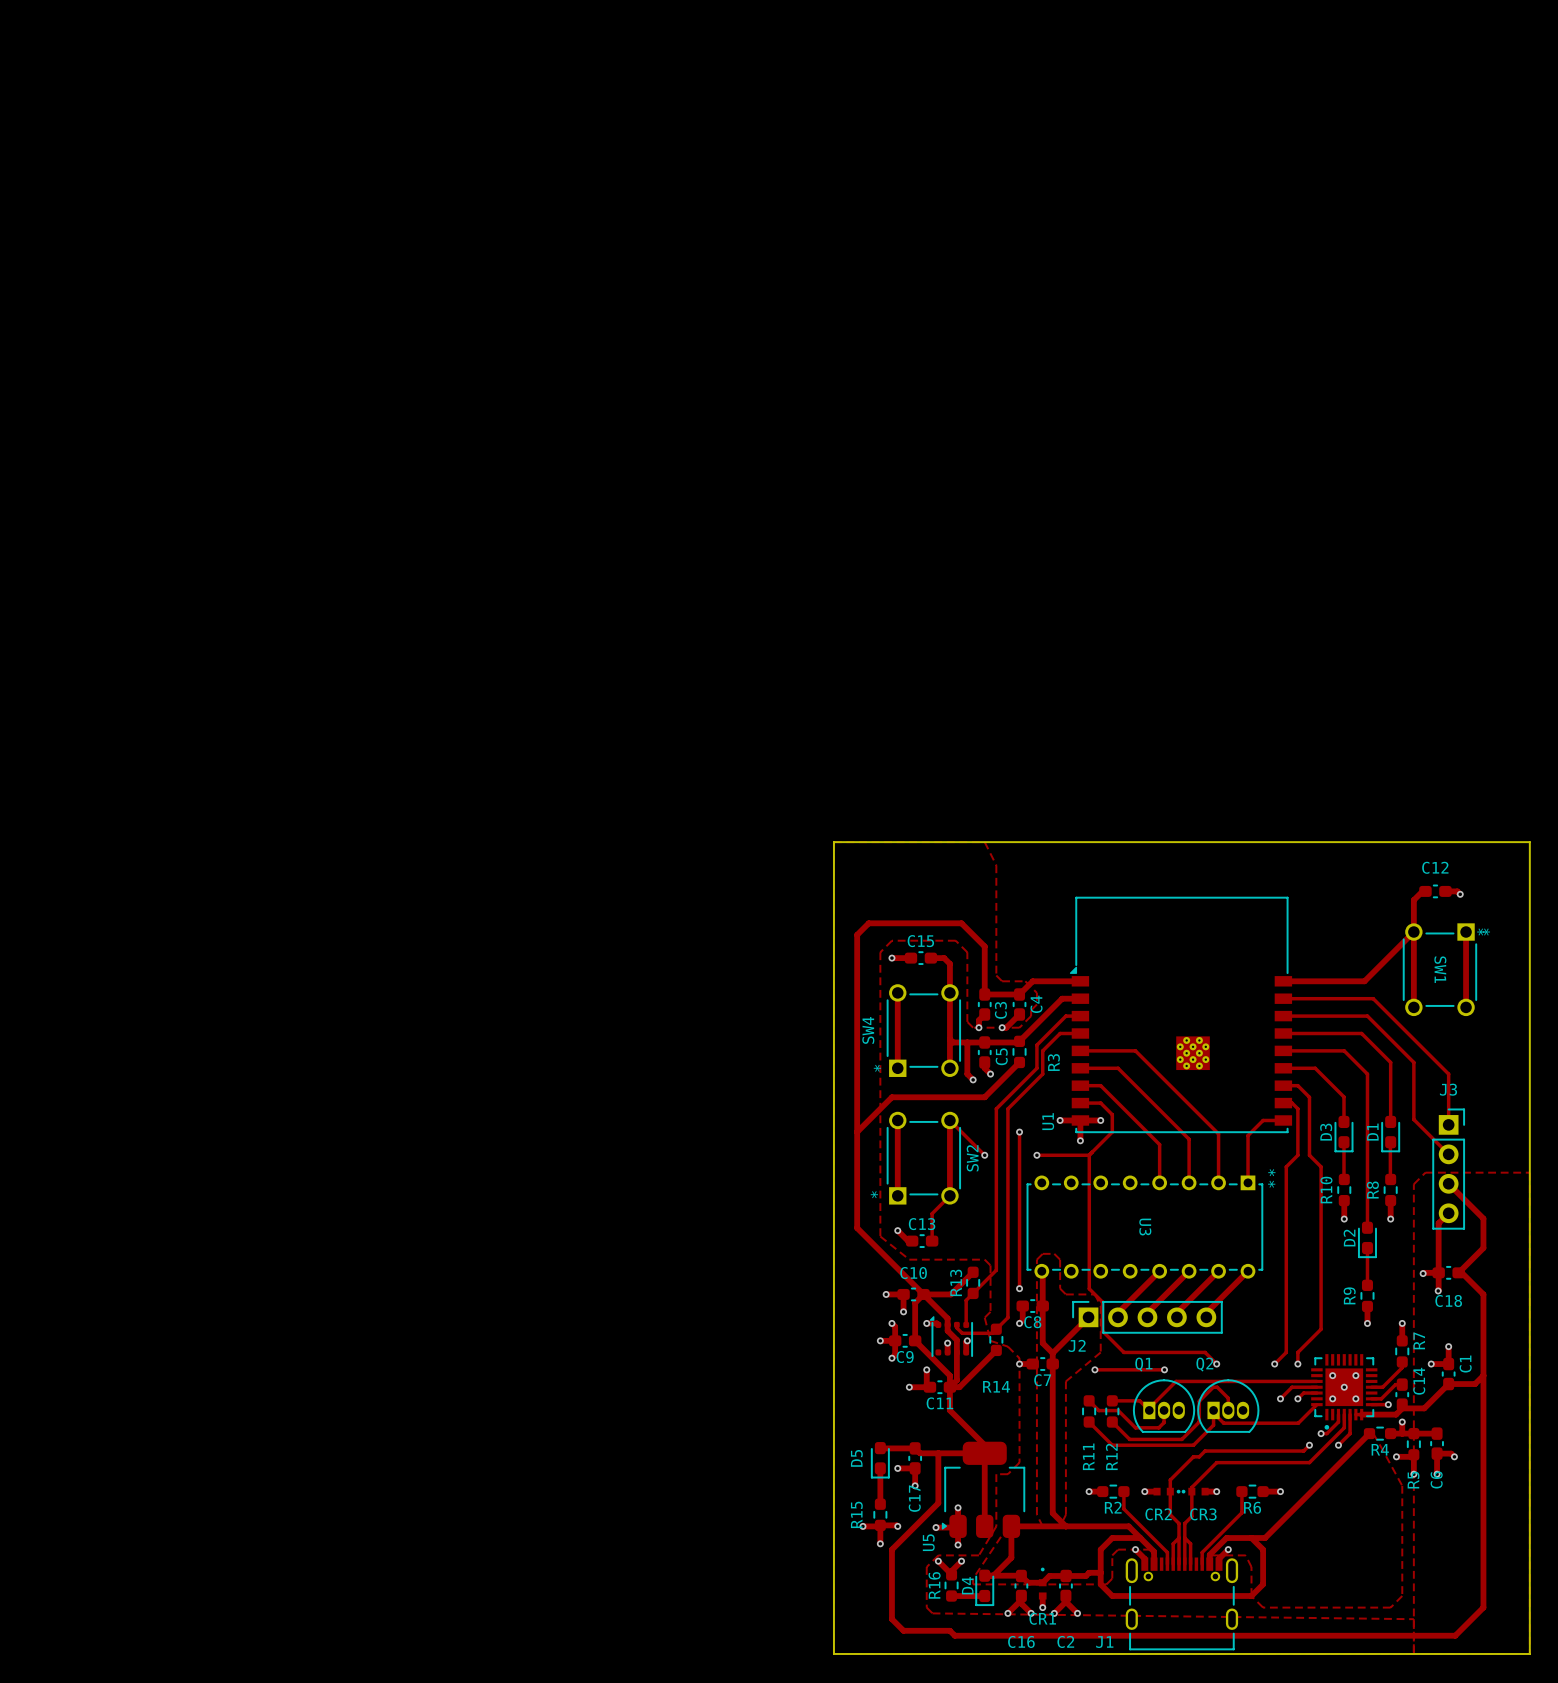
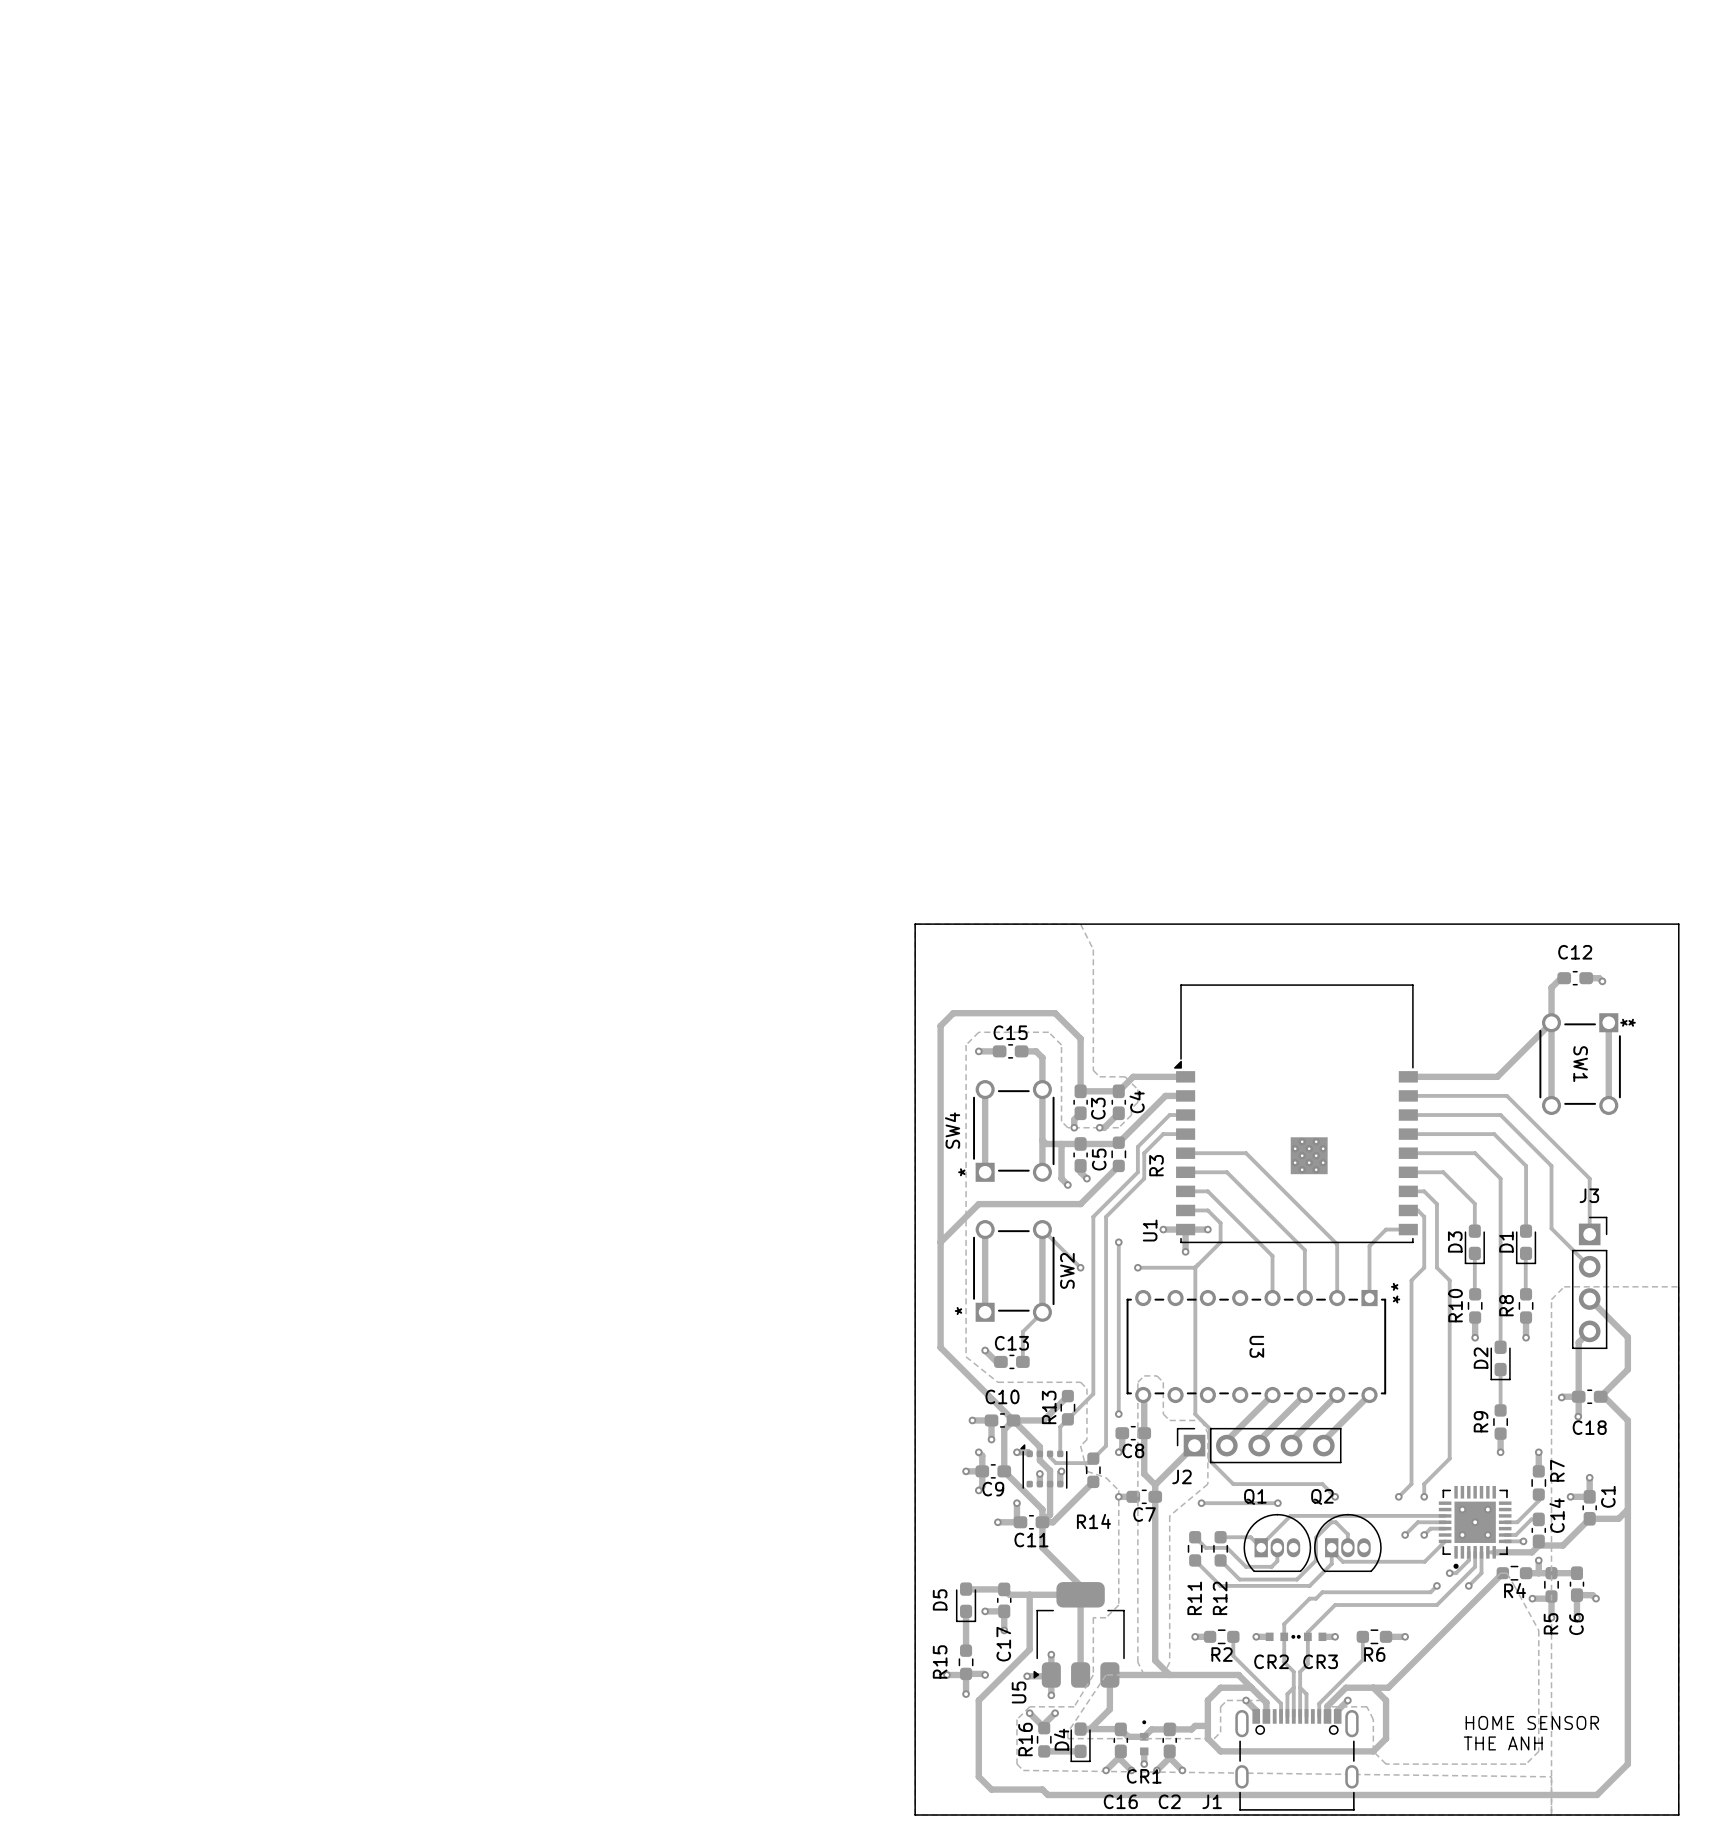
text: none -> HOME SENSOR (1532, 1722)
text: none -> THE ANH (1503, 1743)

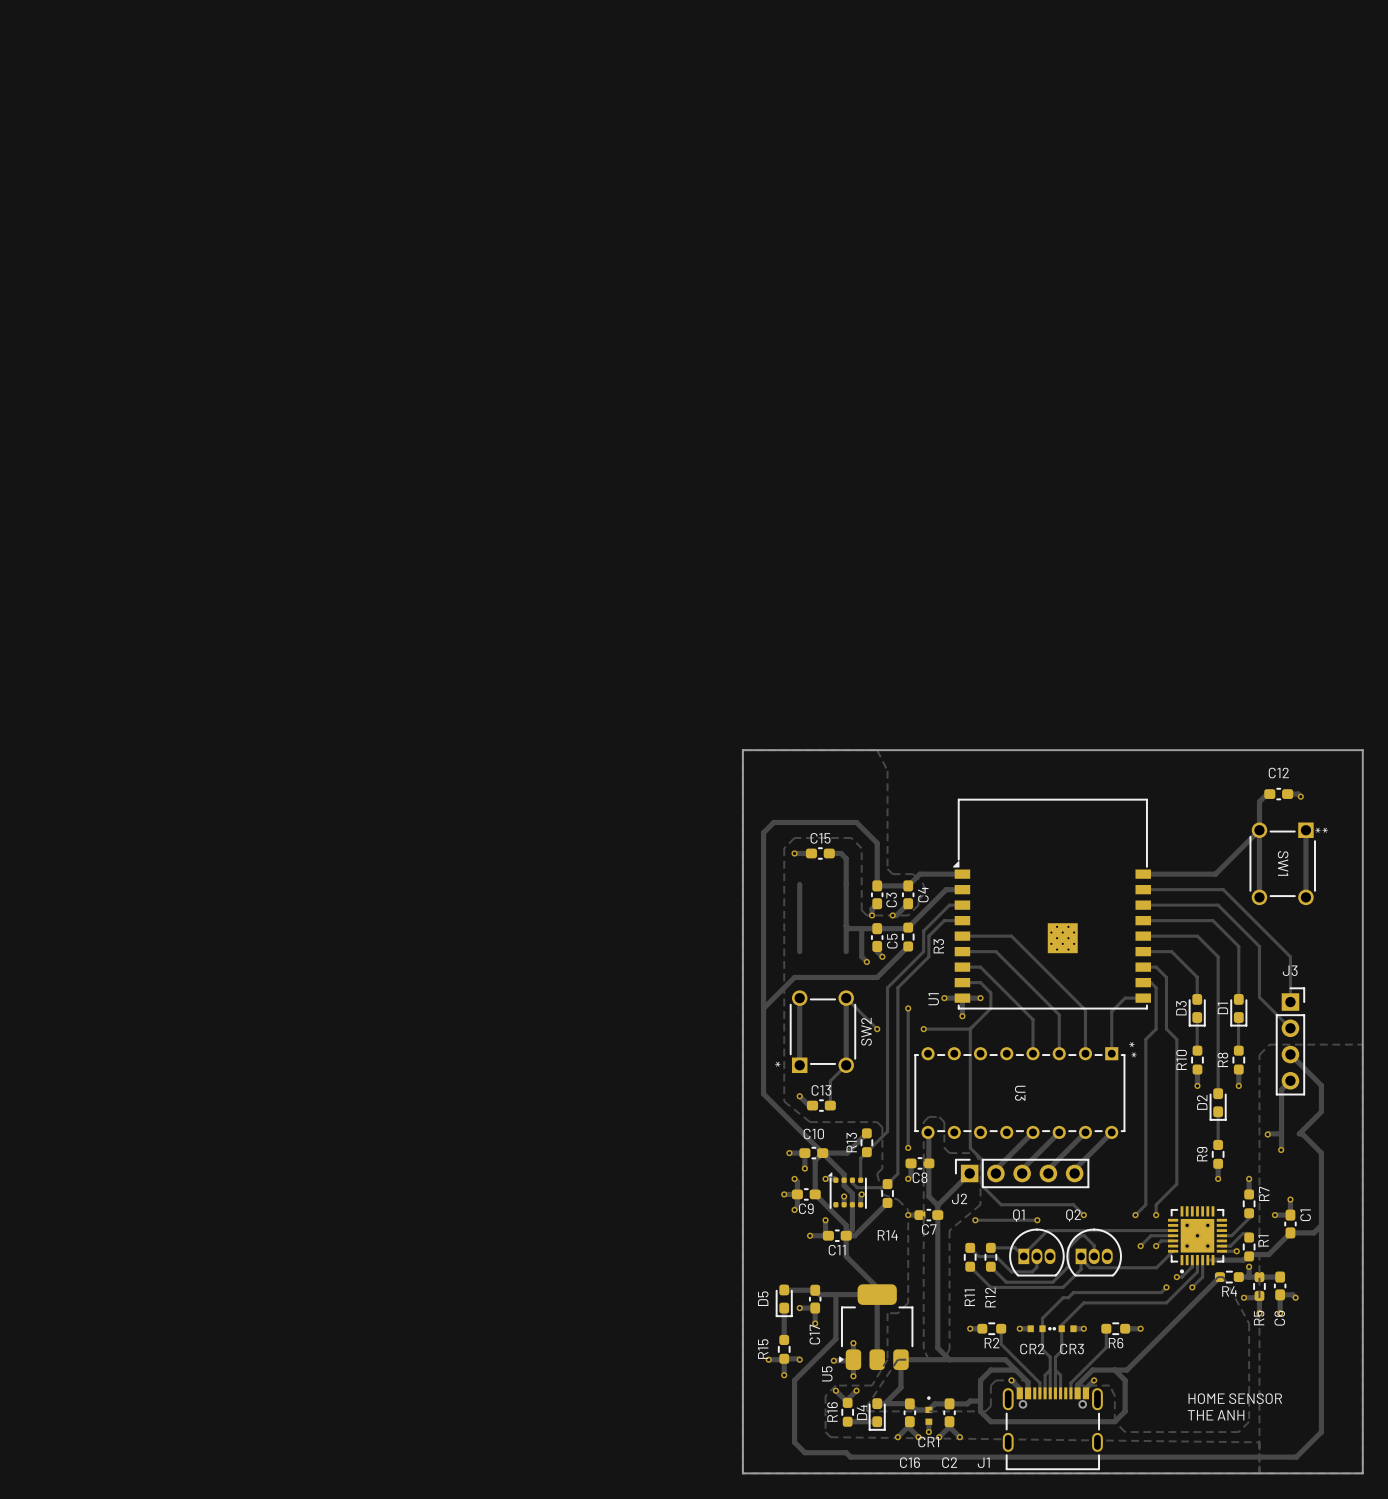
SW4: (1013, 1130) -> none
C18: (1589, 1396) -> none
C14: (1538, 1530) -> none
R1: none -> (1249, 1246)

